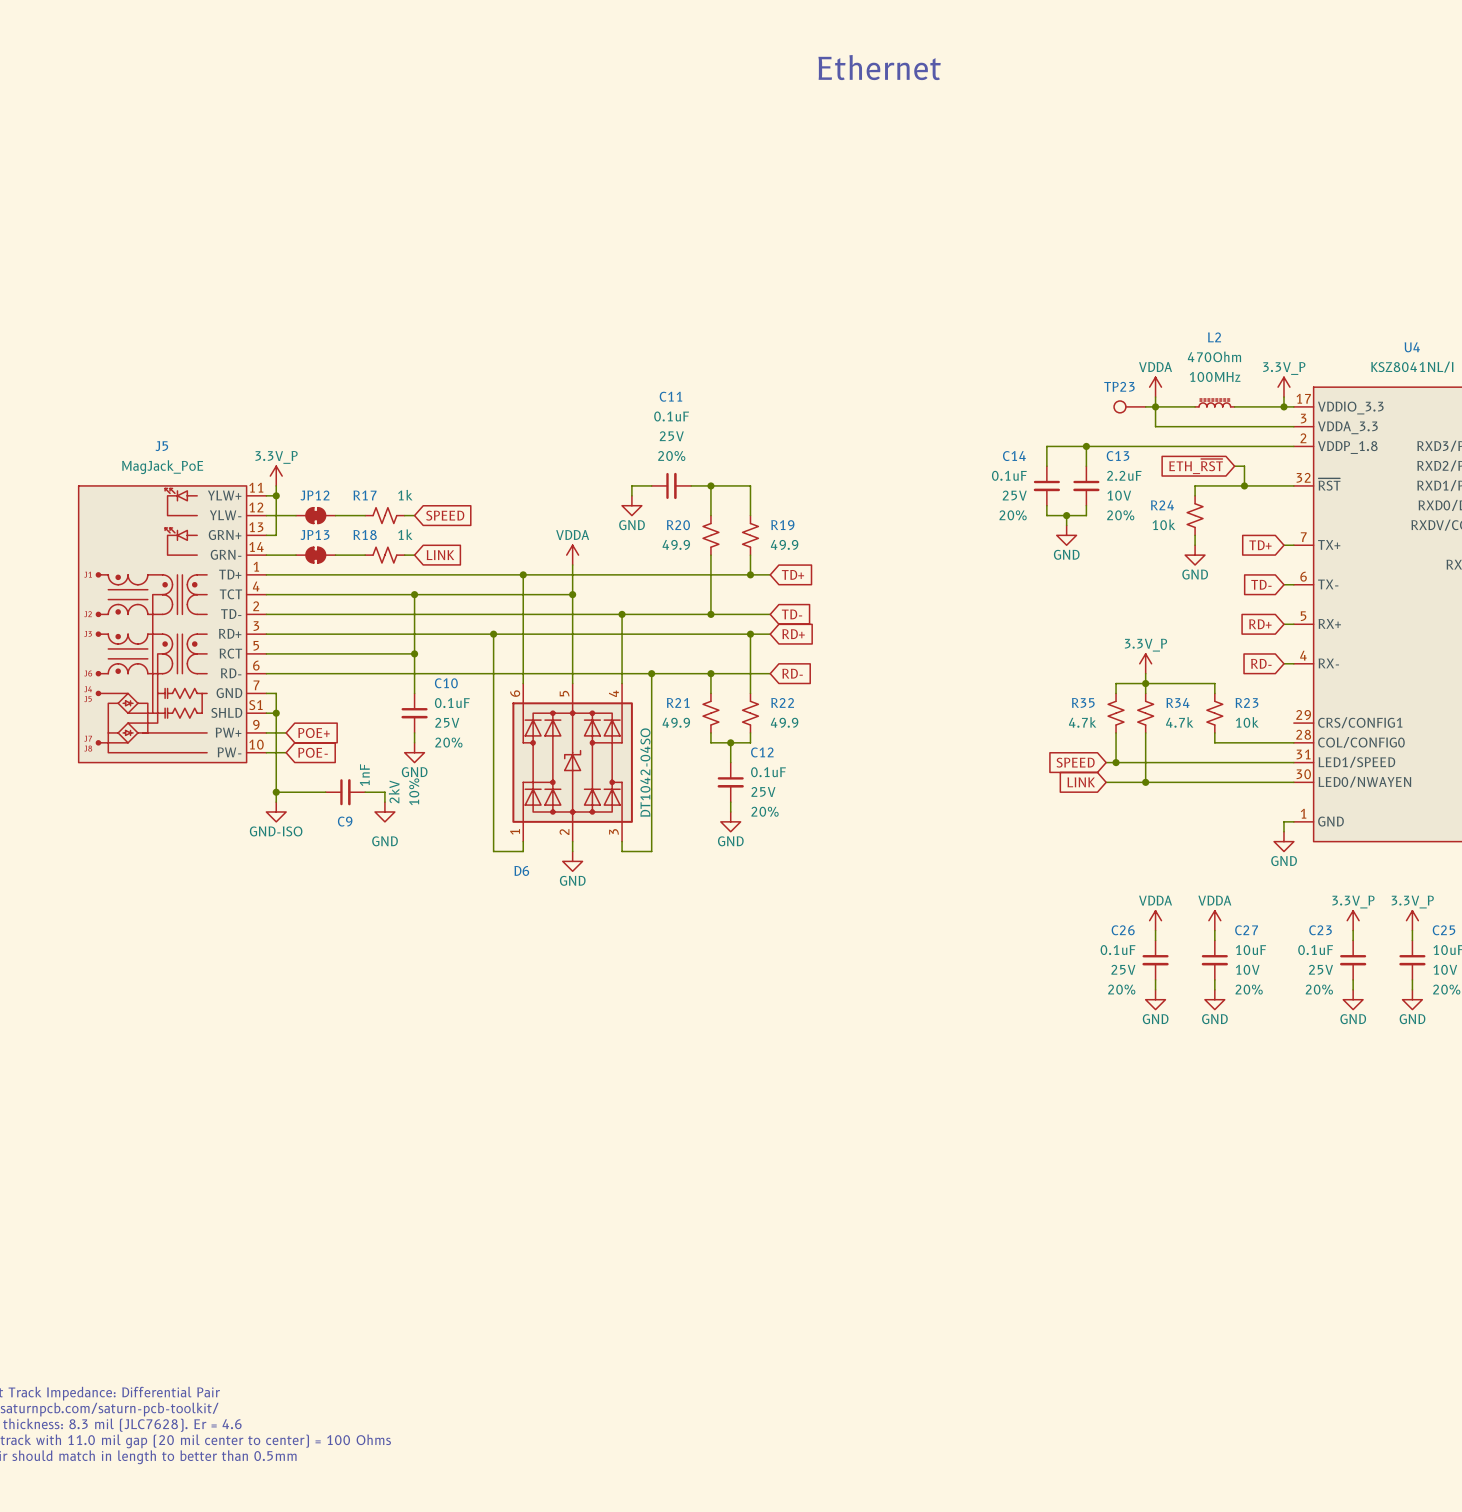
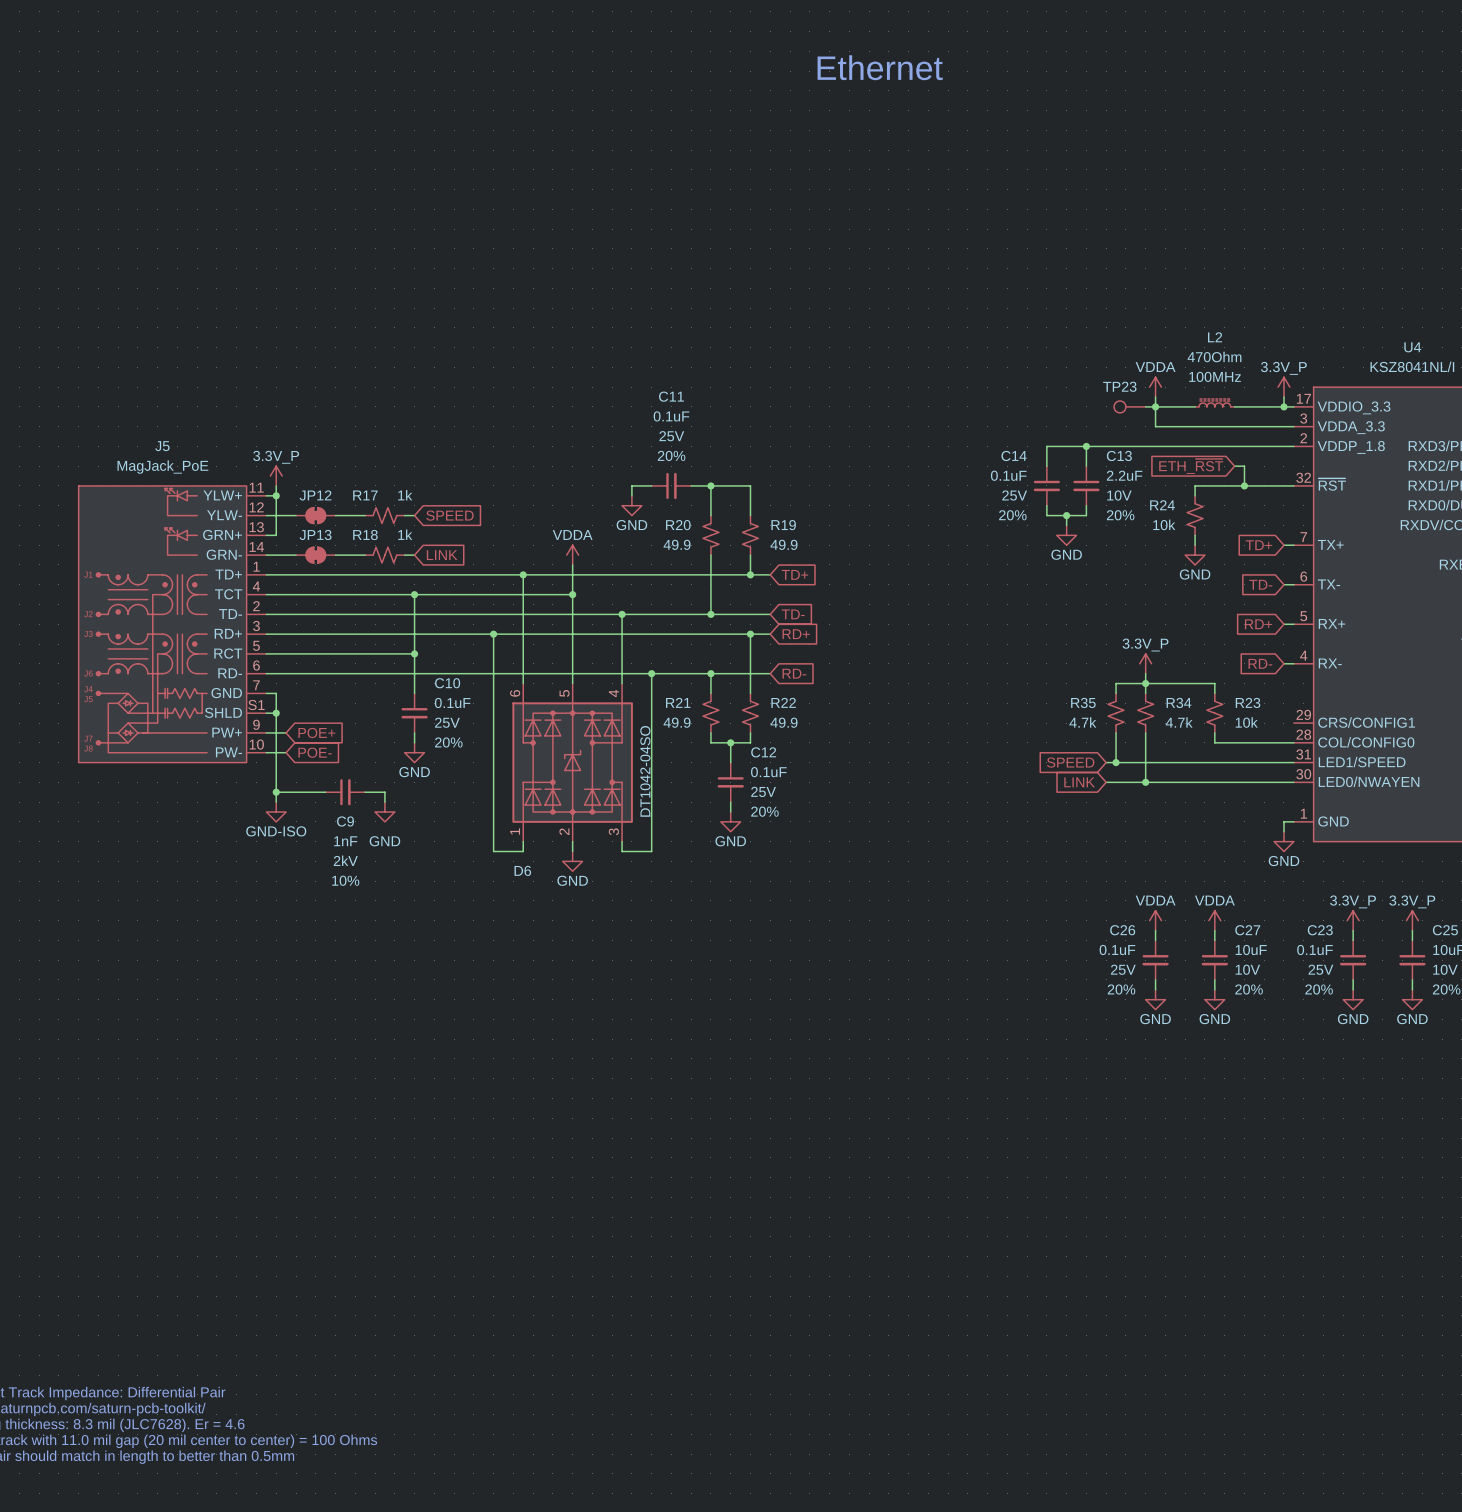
C9 value rotation: 0° (364, 775) -> 90° clockwise (345, 841)
C9 value position: 1nF (364, 775) -> 1nF (345, 841)
C9 text rotation: 0° (394, 791) -> 90° clockwise (345, 860)
C9 text position: 2kV (394, 791) -> 2kV (345, 860)
C9 text rotation: 0° (414, 791) -> 90° clockwise (345, 880)
C9 text position: 10% (414, 791) -> 10% (345, 880)

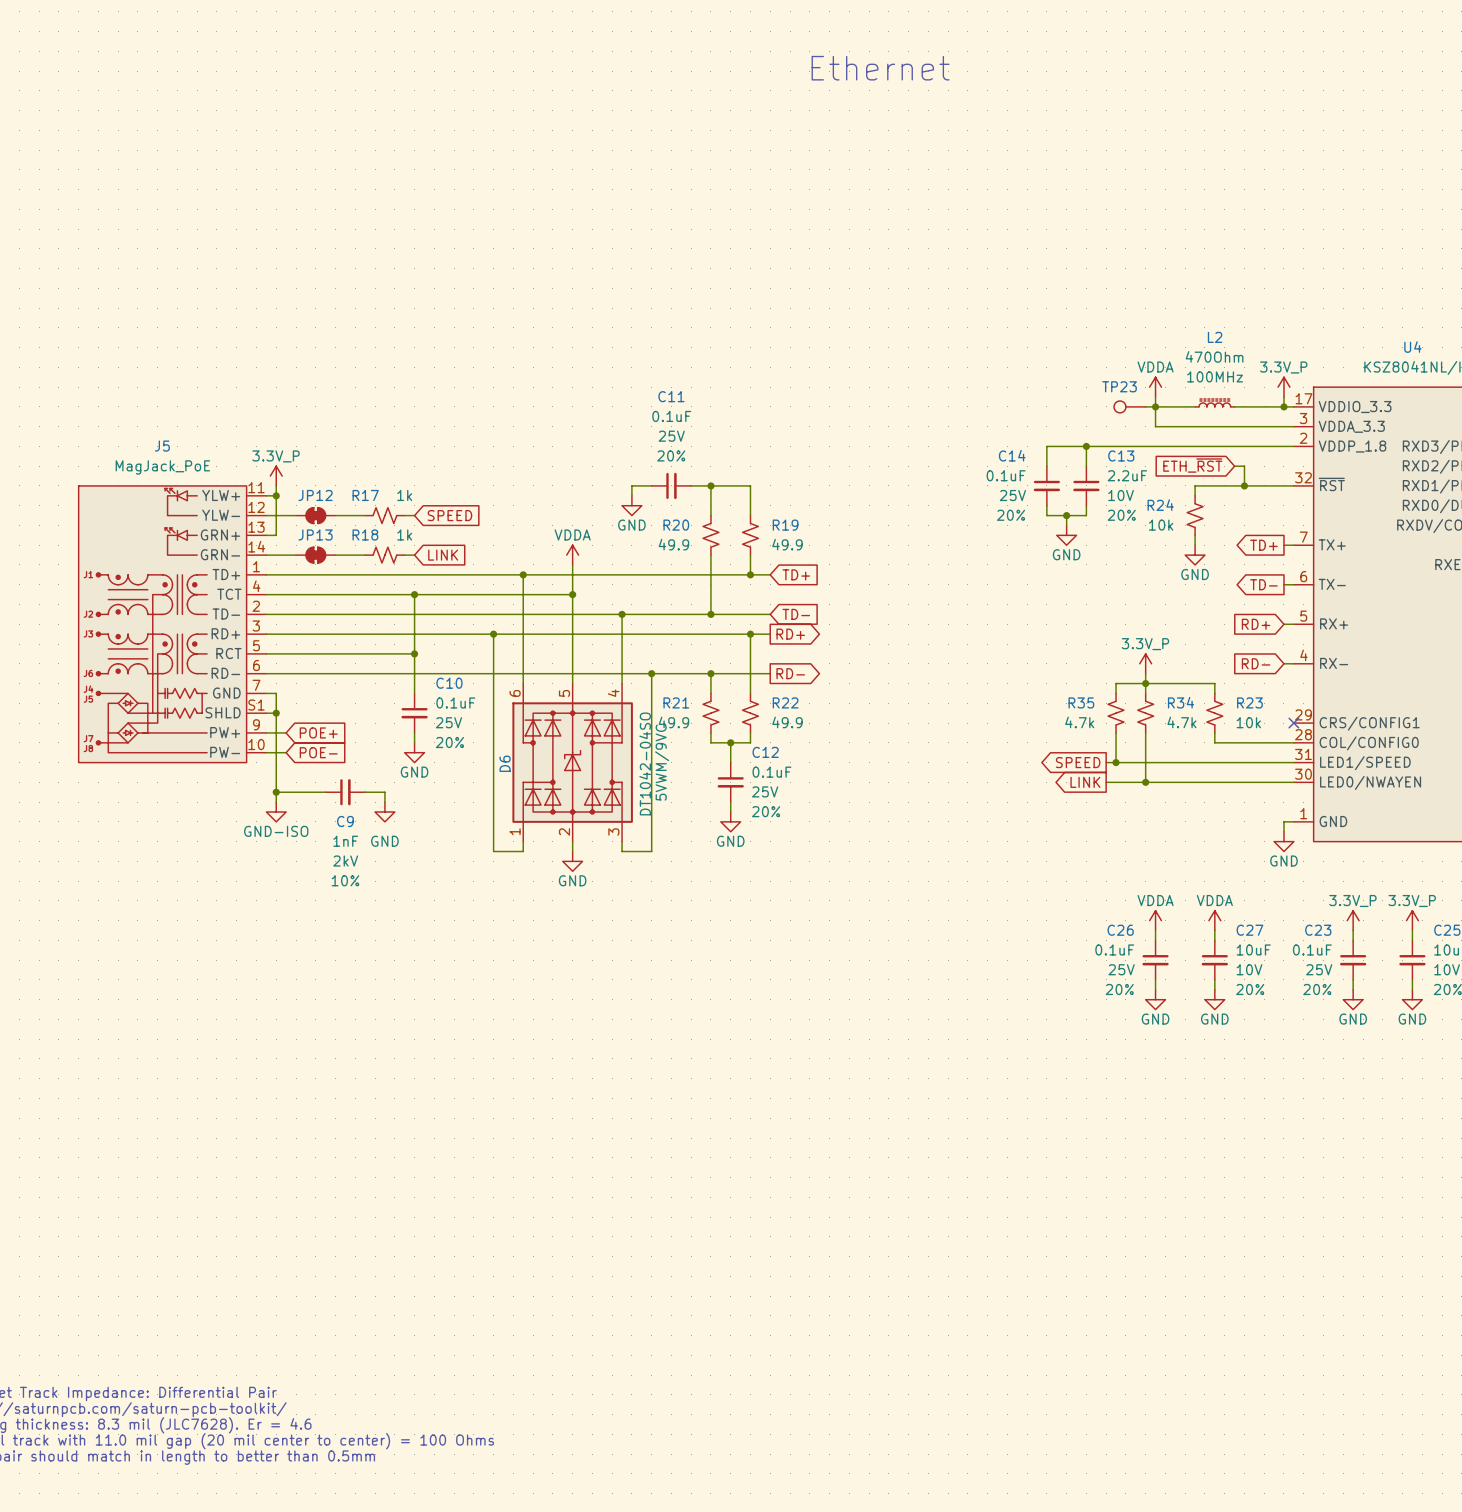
global label shape: input (1258, 545) -> output (1263, 545)
global label shape: input (1260, 584) -> output (1263, 584)
global label shape: input (796, 634) -> output (790, 634)
global label shape: input (794, 673) -> output (790, 673)
no-connect mark: none -> (1293, 723)
D6 text: none -> 5VWM/9VC (662, 762)
global label shape: input (1070, 762) -> output (1078, 762)
global label shape: input (1079, 782) -> output (1085, 782)
D6 name rotation: 0° (522, 870) -> 90° counterclockwise (505, 763)
D6 name position: D6 (522, 870) -> D6 (505, 763)

